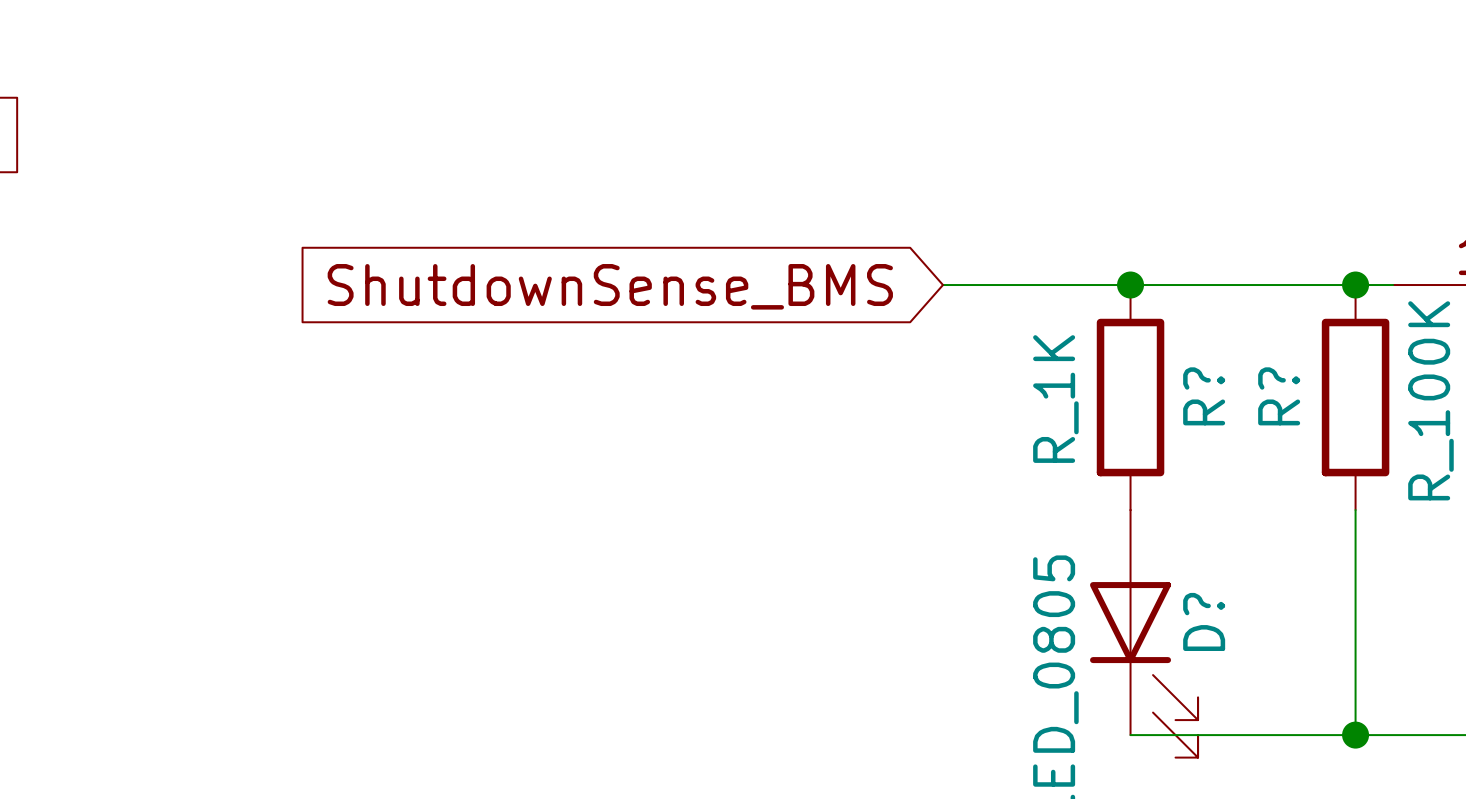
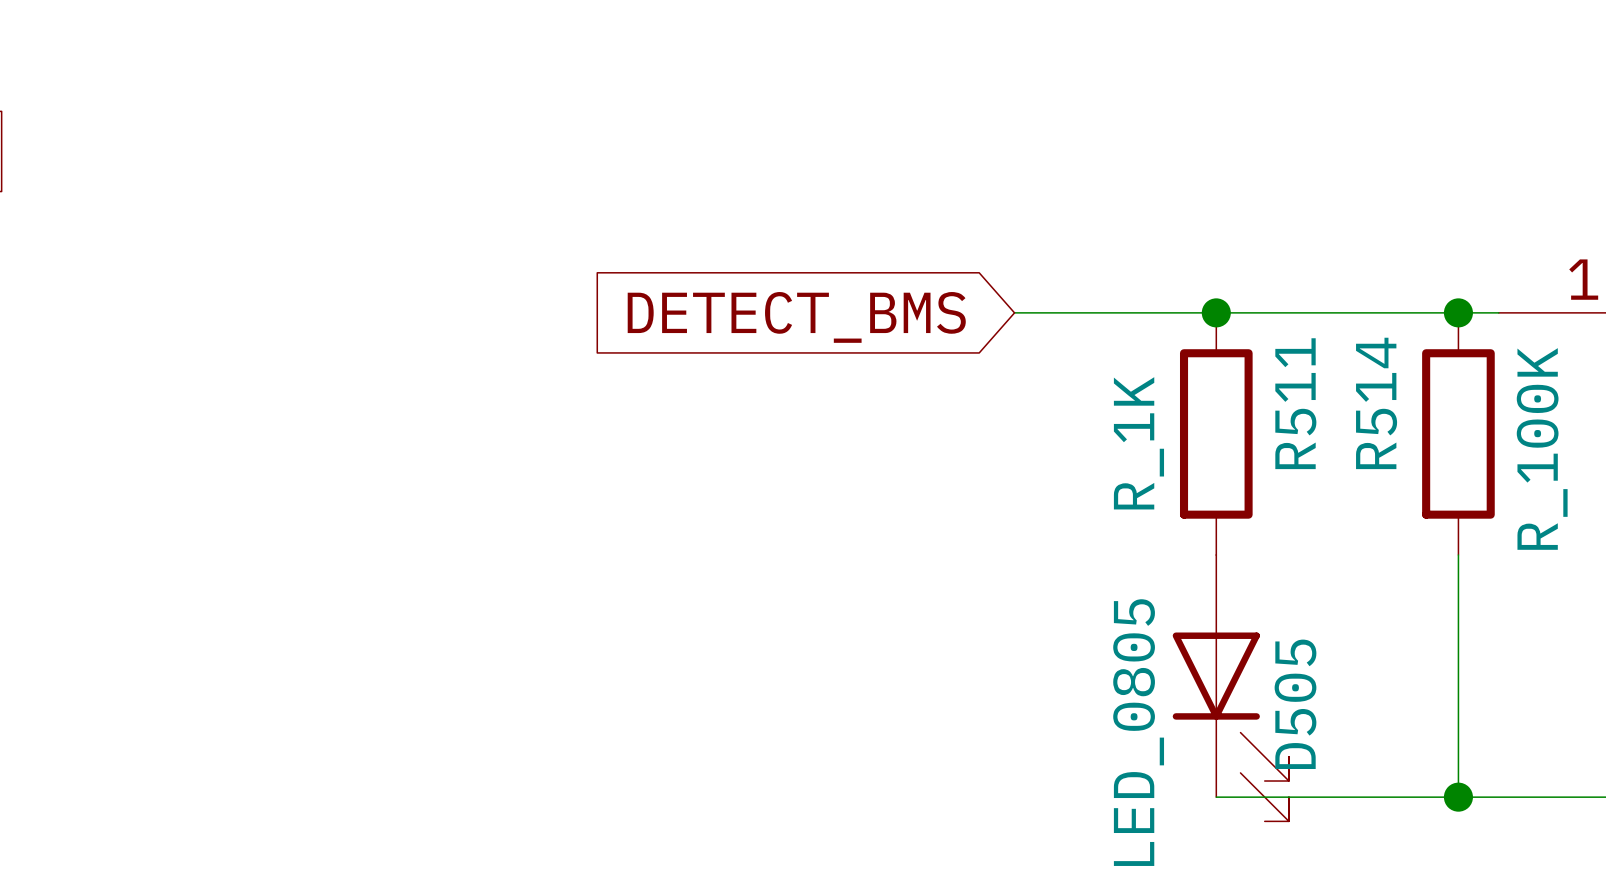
global label: ShutdownSense_BMS (610, 286) -> DETECT_BMS (796, 317)
R? name: R? (1204, 396) -> R511 (1295, 403)
R? name: R? (1279, 396) -> R514 (1376, 403)
D? name: D? (1204, 621) -> D505 (1295, 704)

